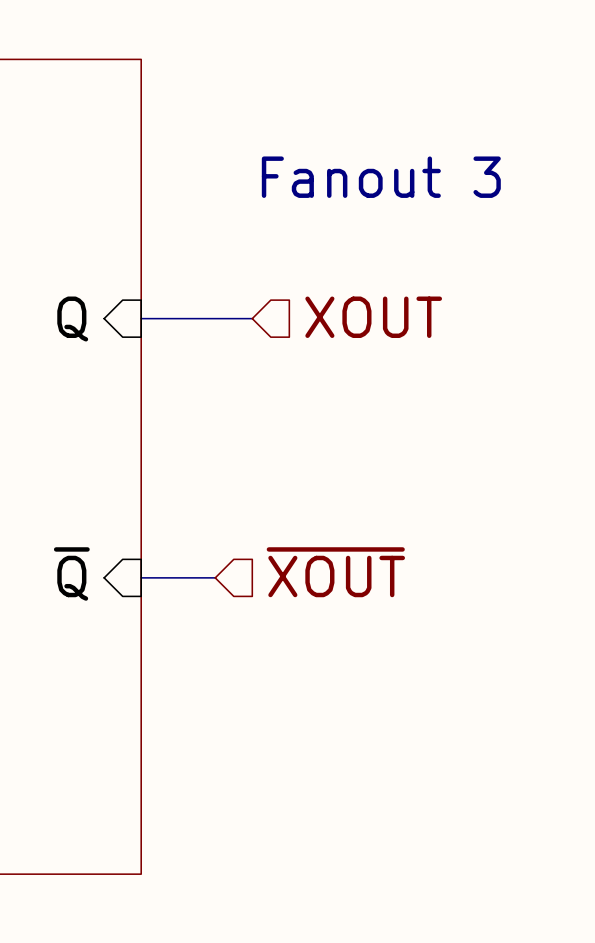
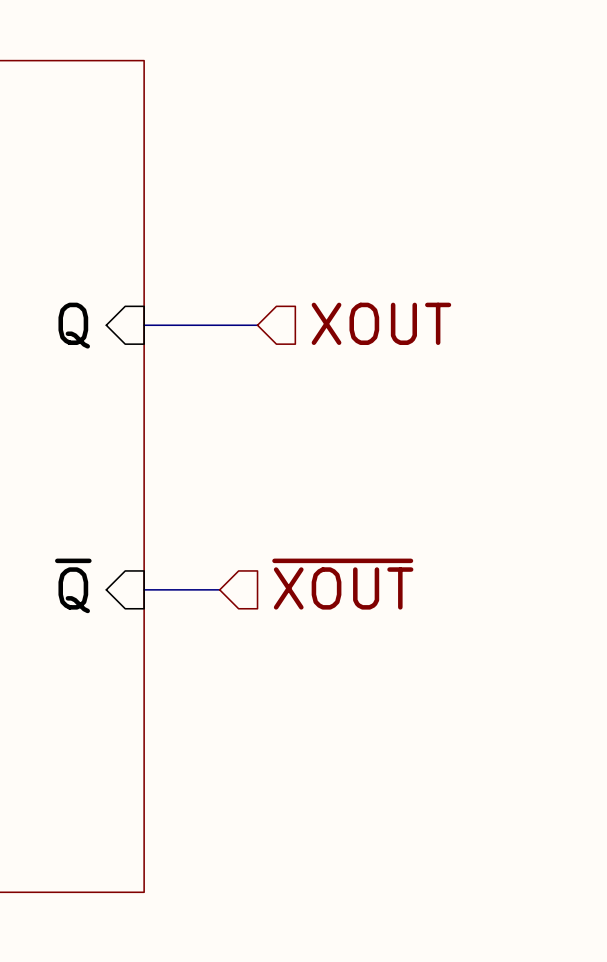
text: Fanout 3 (381, 177) -> none

